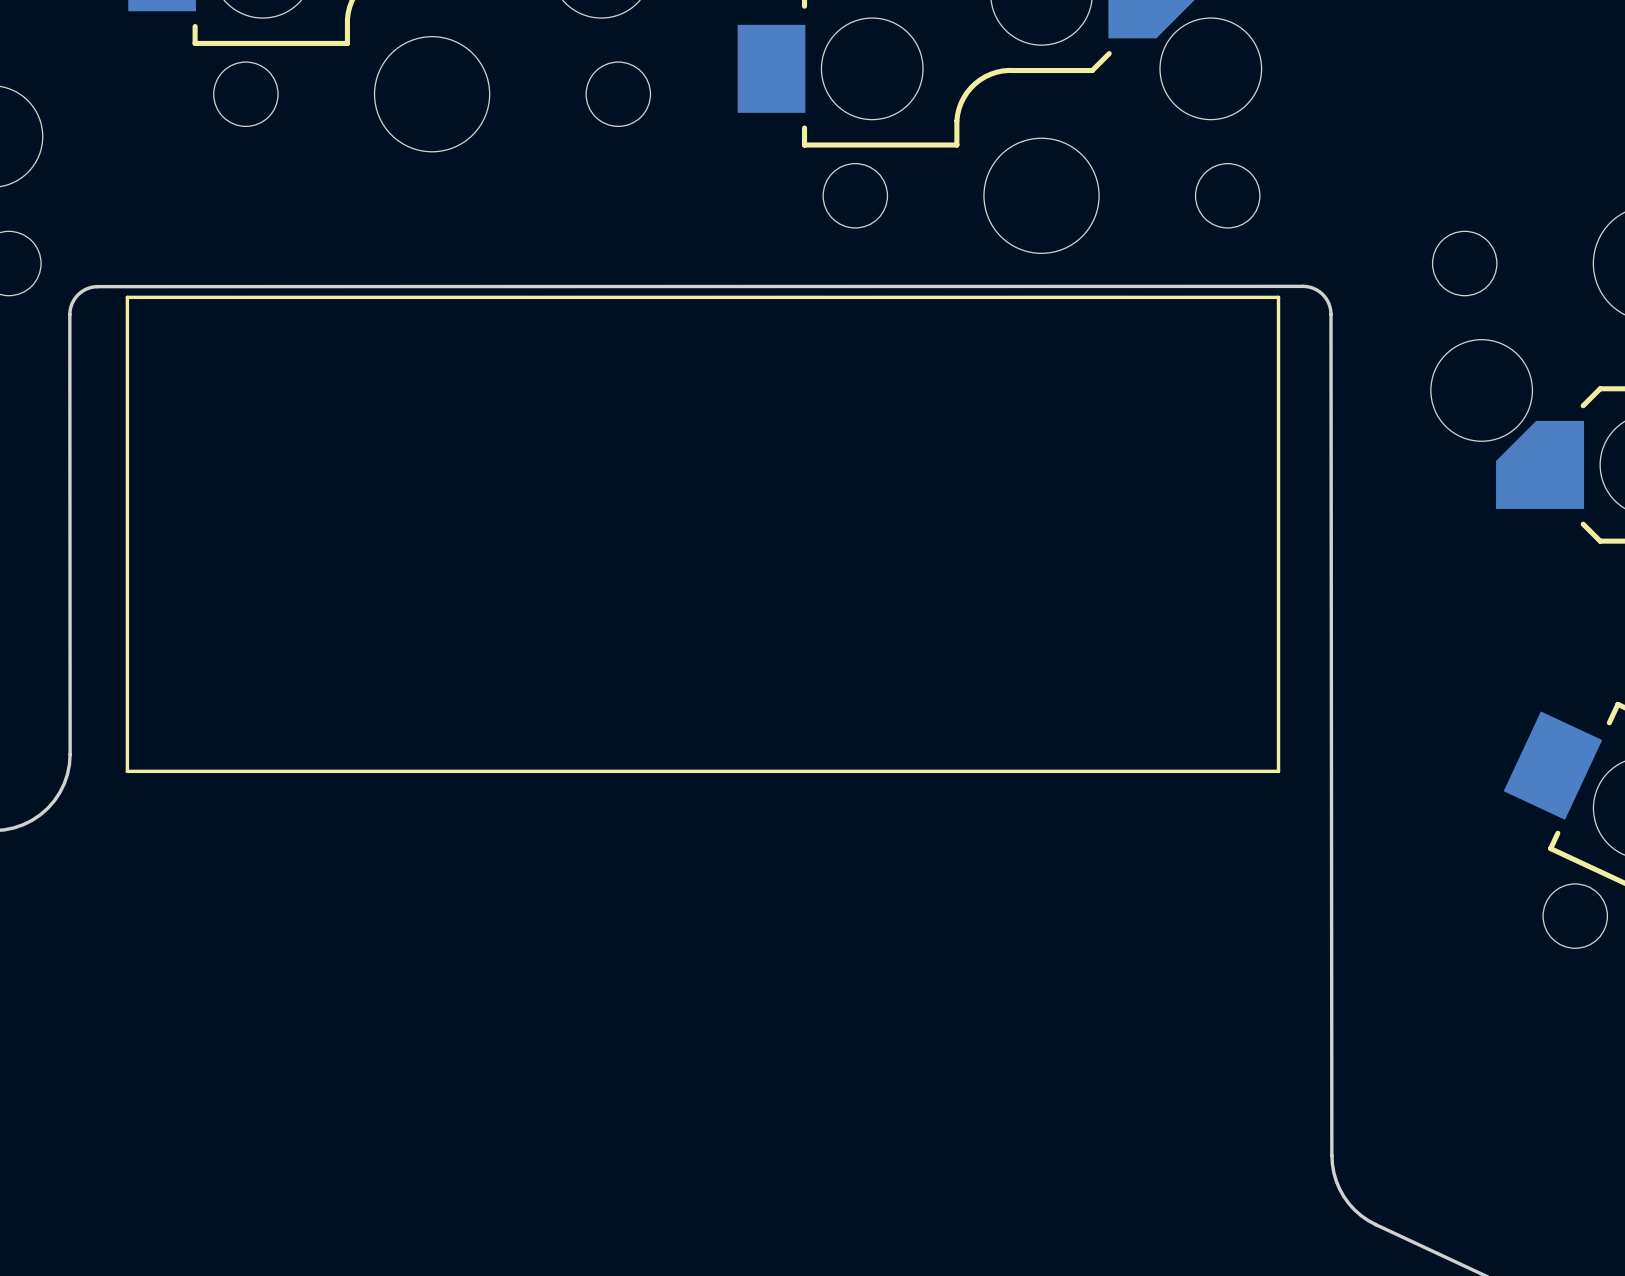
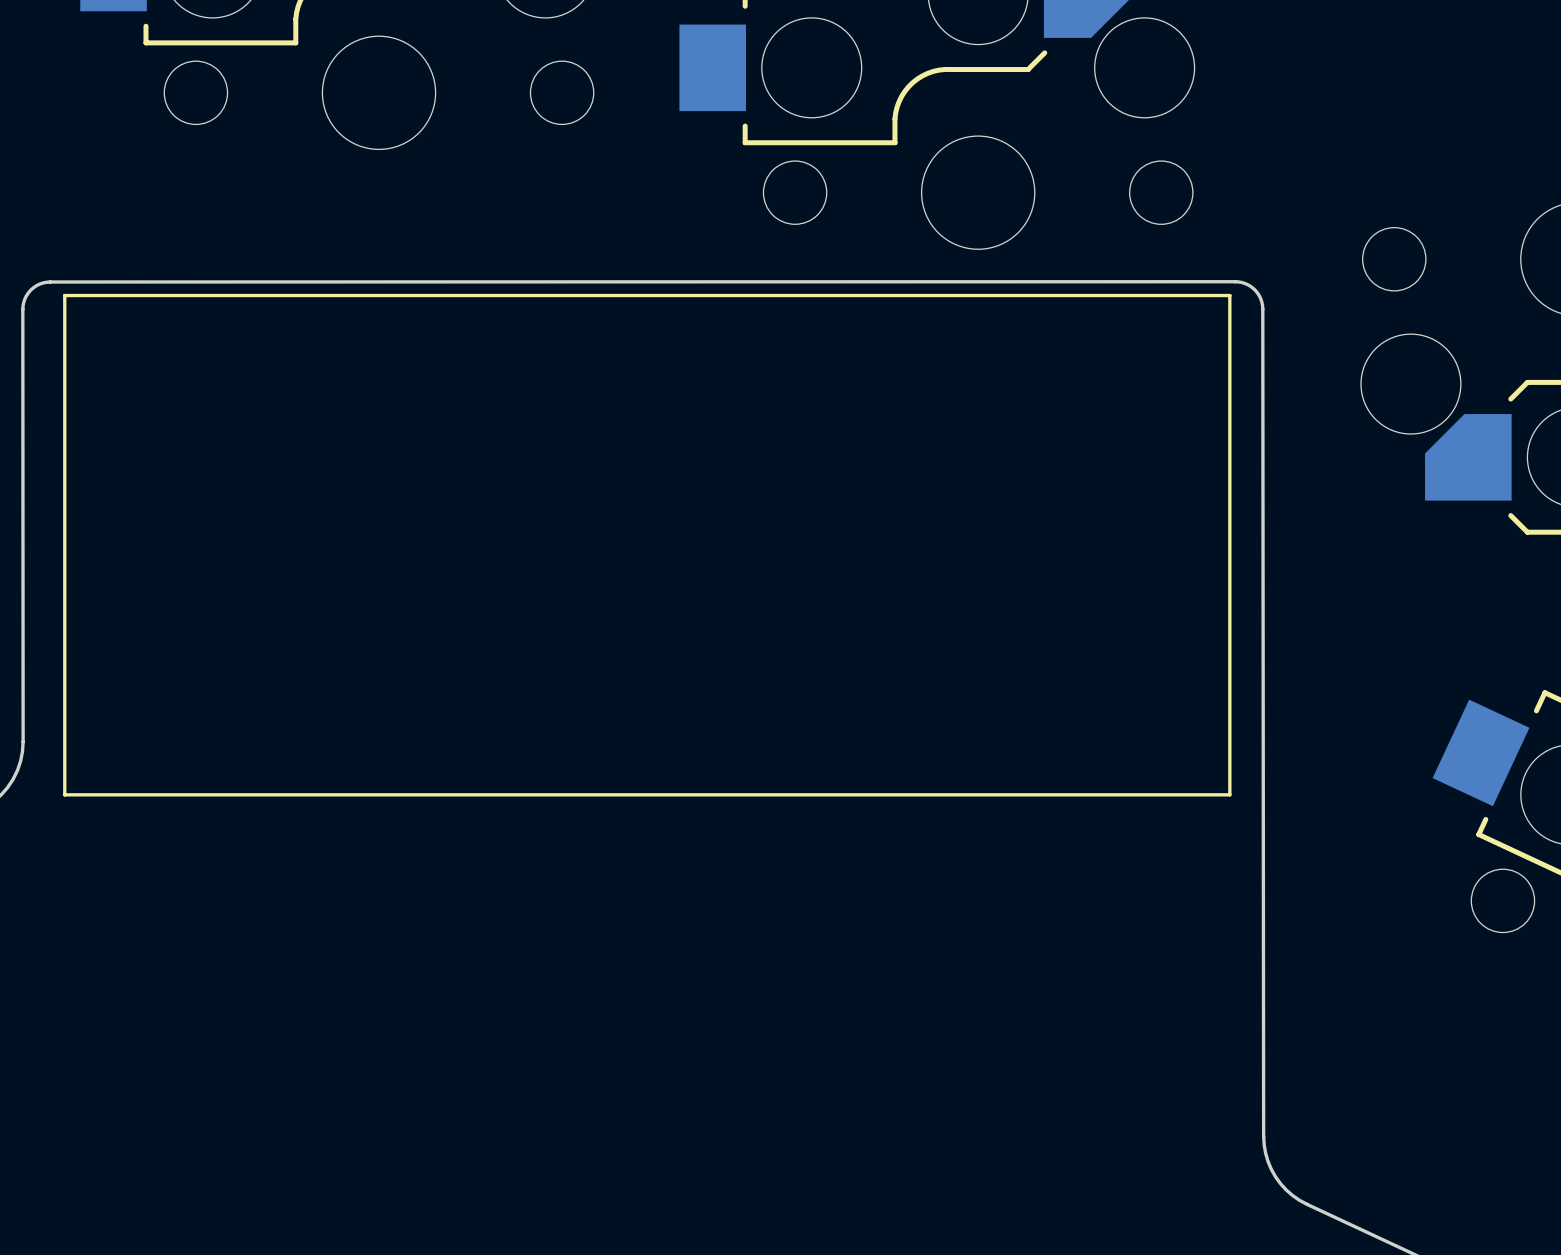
line: (1278, 297) (127, 297) (127, 771) (1278, 771) (1278, 297) -> (1229, 295) (1229, 794) (64, 794) (64, 295) (1229, 295)

